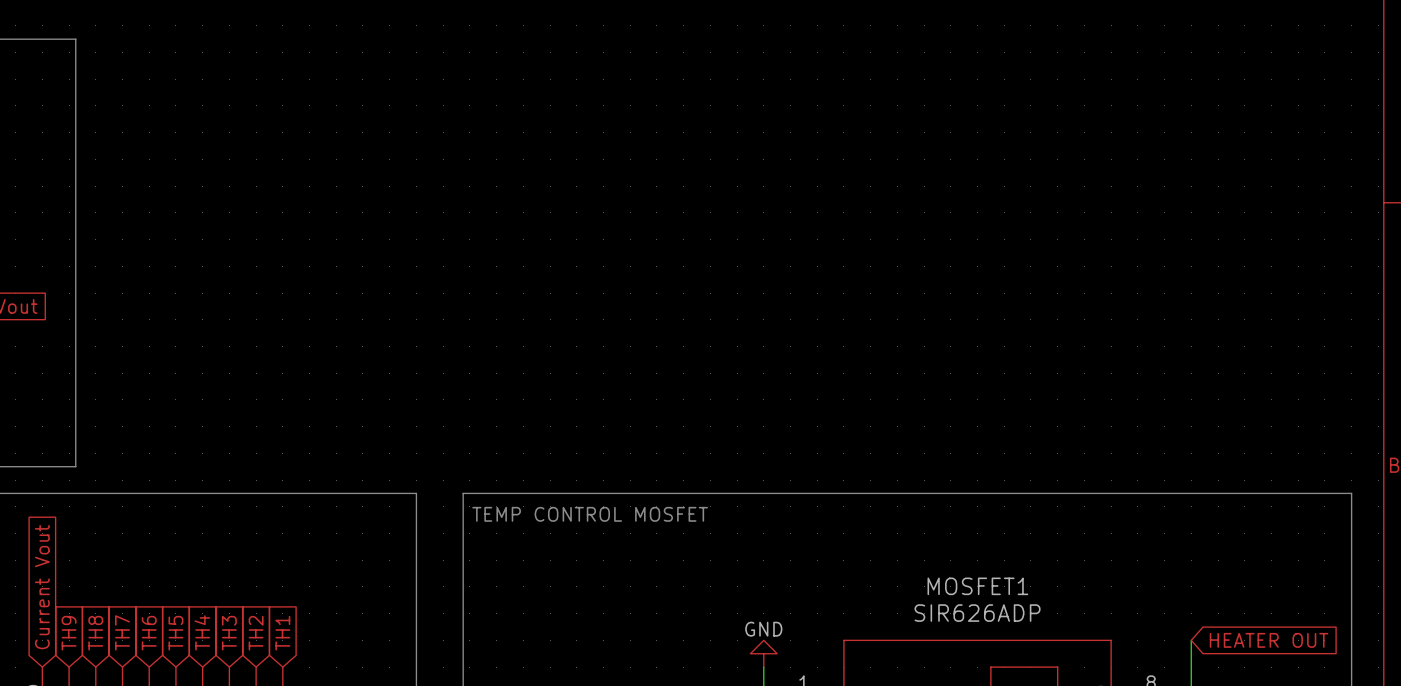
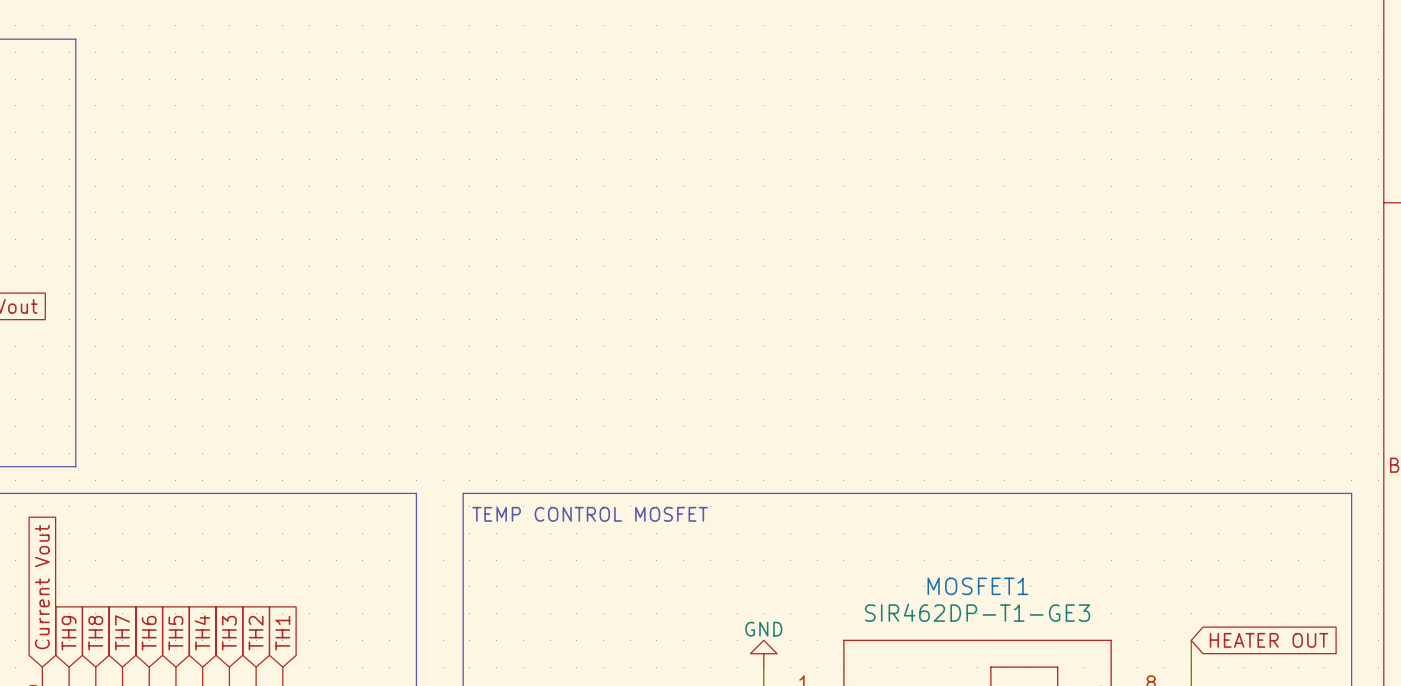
MOSFET1 value: SIR626ADP (977, 613) -> SIR462DP-T1-GE3 (977, 612)

